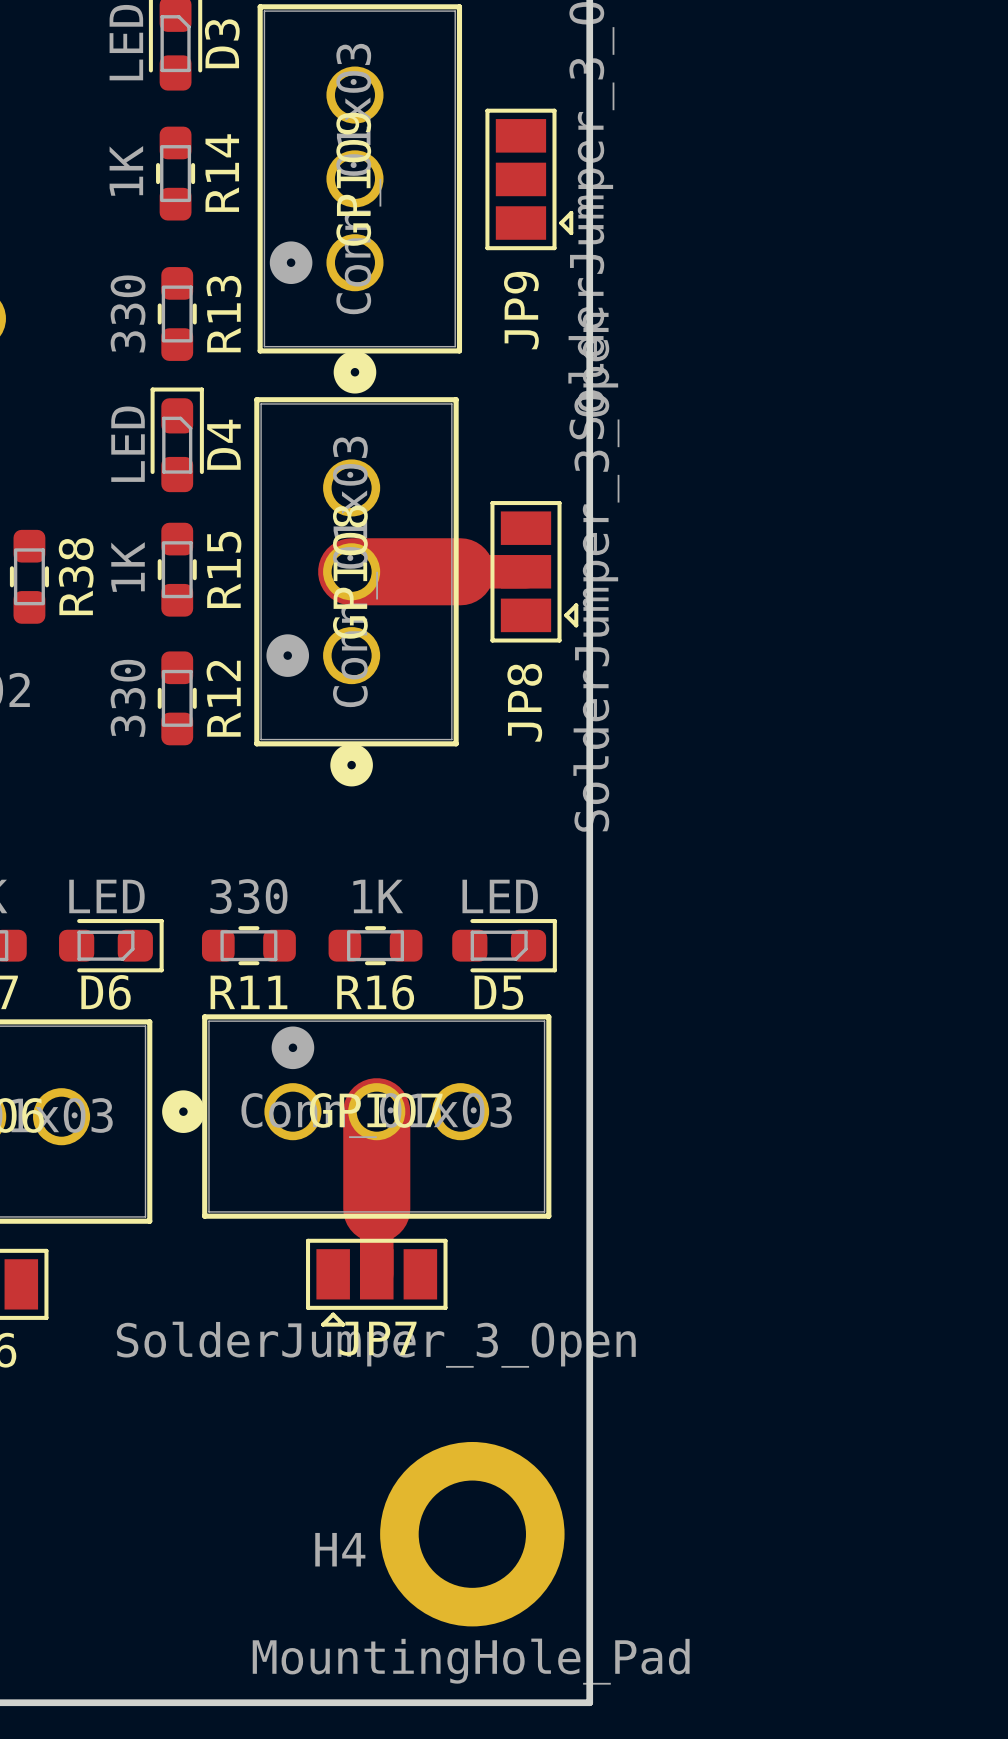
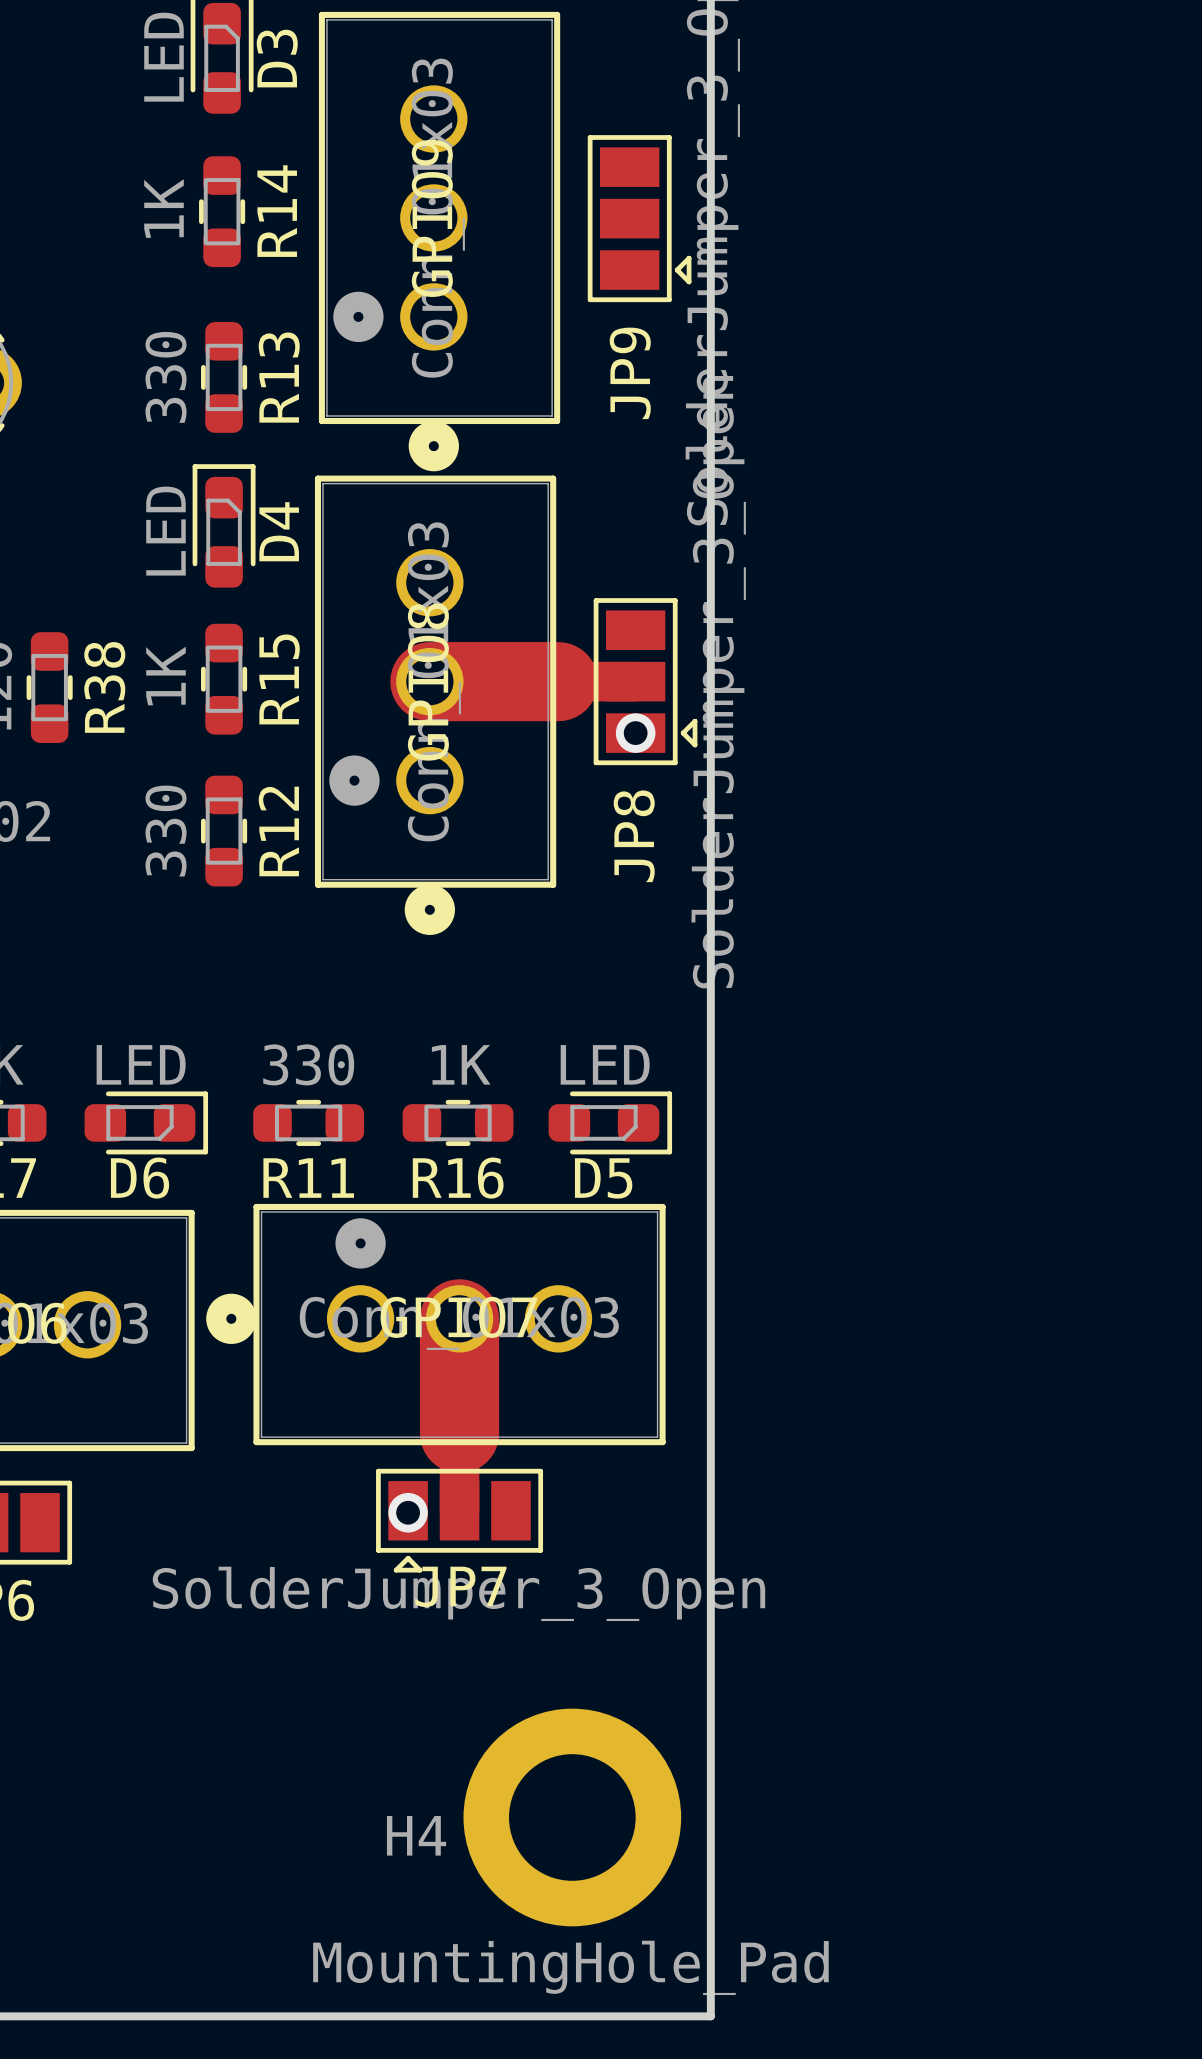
via: none -> (635, 733)
via: none -> (408, 1512)

